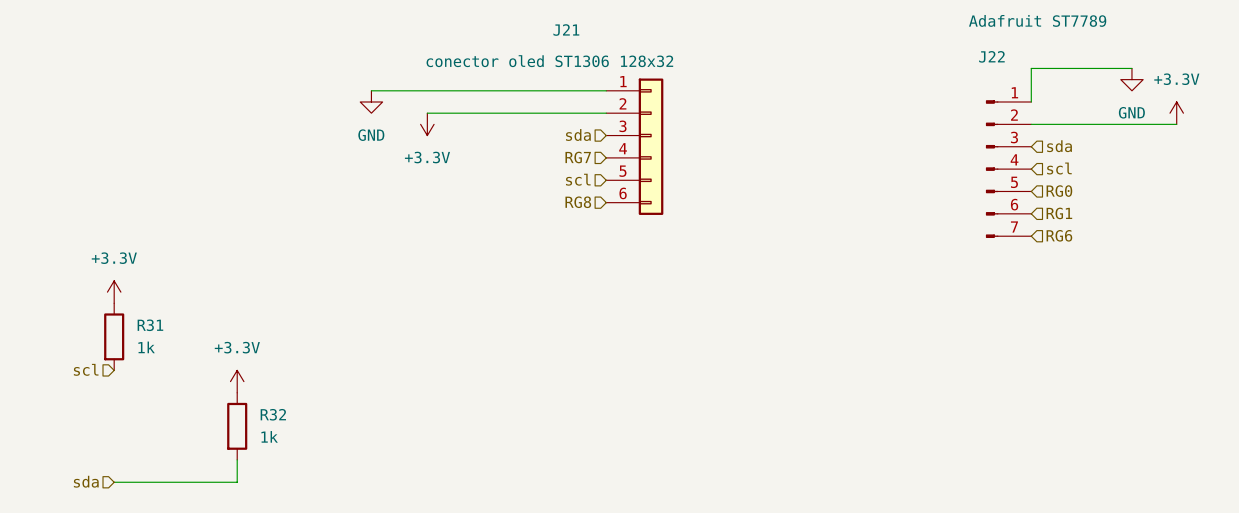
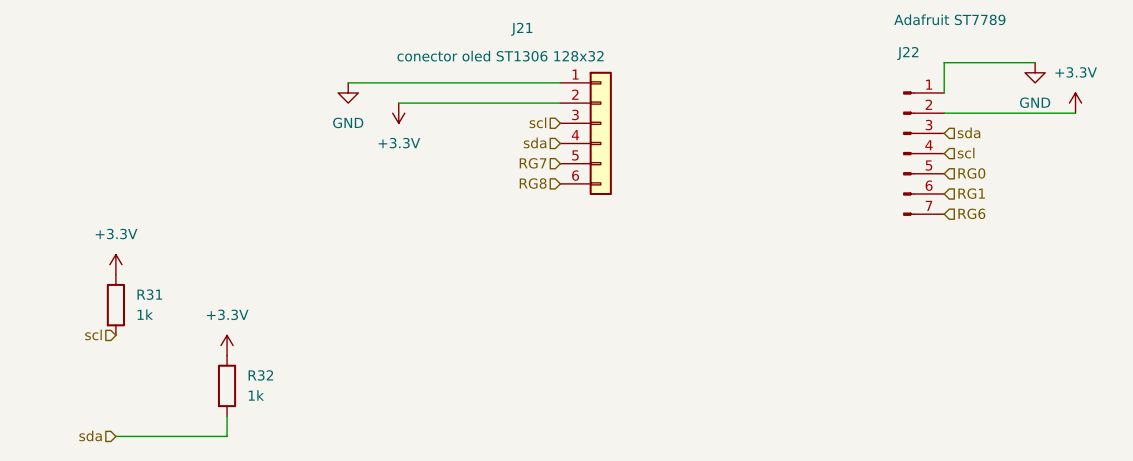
hierarchical label: sda (578, 135) -> scl (537, 122)
hierarchical label: RG7 (578, 157) -> sda (535, 143)
hierarchical label: scl (578, 179) -> RG7 (533, 163)

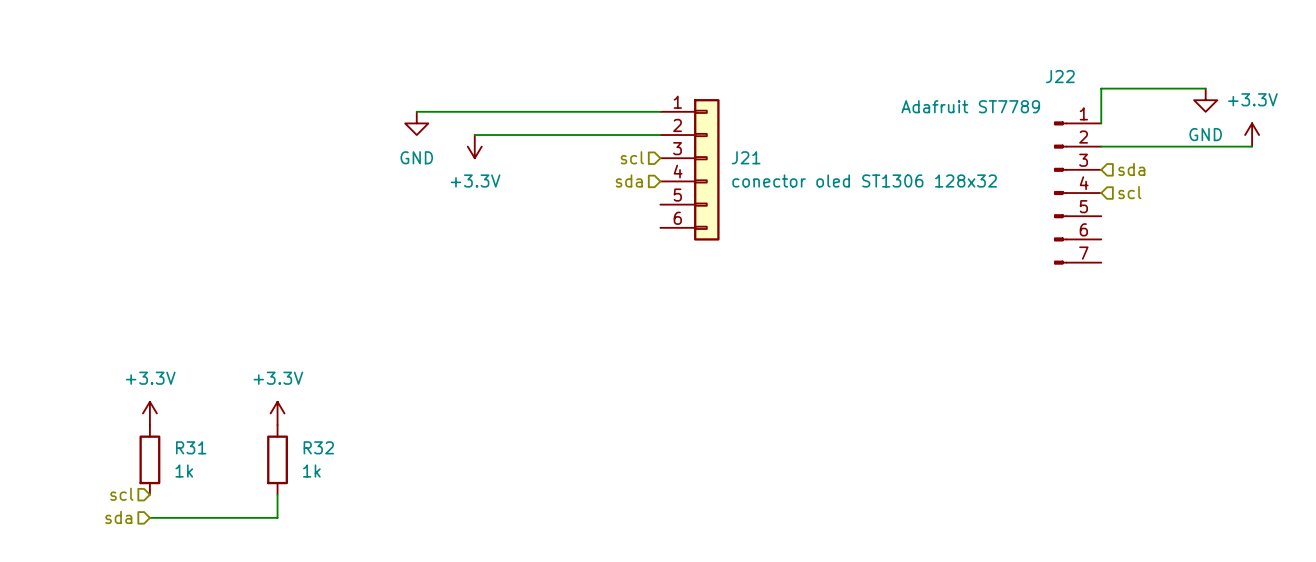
J22 value position: Adafruit ST7789 (949, 19) -> Adafruit ST7789 (970, 106)
J21 name position: J21 (521, 29) -> J21 (746, 157)
J21 value position: conector oled ST1306 128x32 (500, 56) -> conector oled ST1306 128x32 (864, 180)
hierarchical label: RG7 (533, 163) -> none
hierarchical label: RG0 (971, 173) -> none
hierarchical label: RG8 (533, 183) -> none
hierarchical label: RG1 (971, 193) -> none
hierarchical label: RG6 (971, 213) -> none
power symbol position: +3.3V (115, 264) -> +3.3V (149, 413)
R31 position: (115, 305) -> (149, 459)
hierarchical label position: scl (93, 334) -> scl (121, 494)

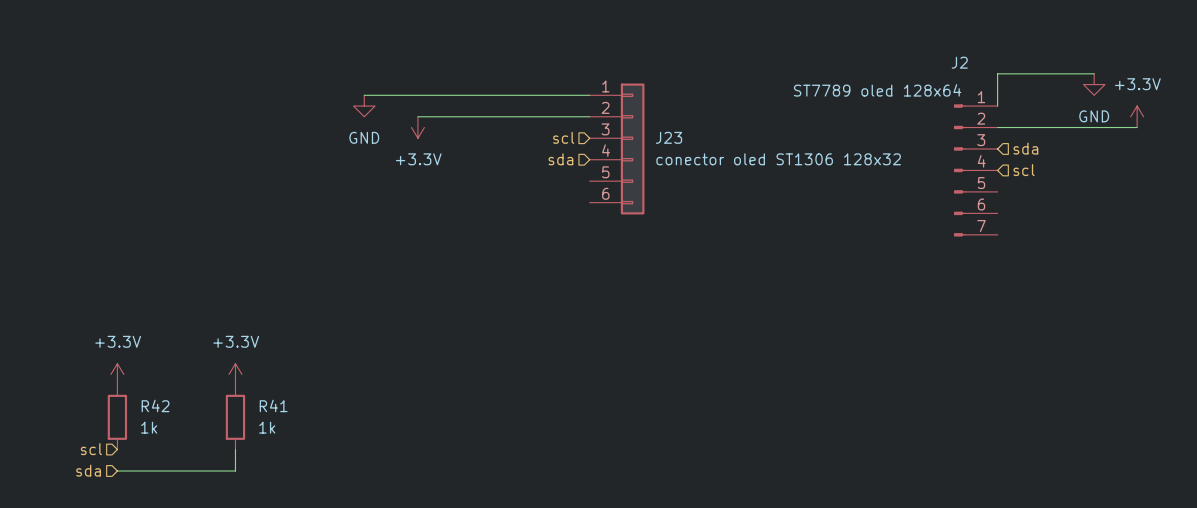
J22 name: J22 (1060, 76) -> J2 (959, 62)
J22 value: Adafruit ST7789 (970, 106) -> ST7789 oled 128x64 (877, 90)
J21 name: J21 (746, 157) -> J23 (669, 137)
R31 name: R31 (191, 447) -> R42 (155, 405)
R32 name: R32 (318, 447) -> R41 (273, 405)

